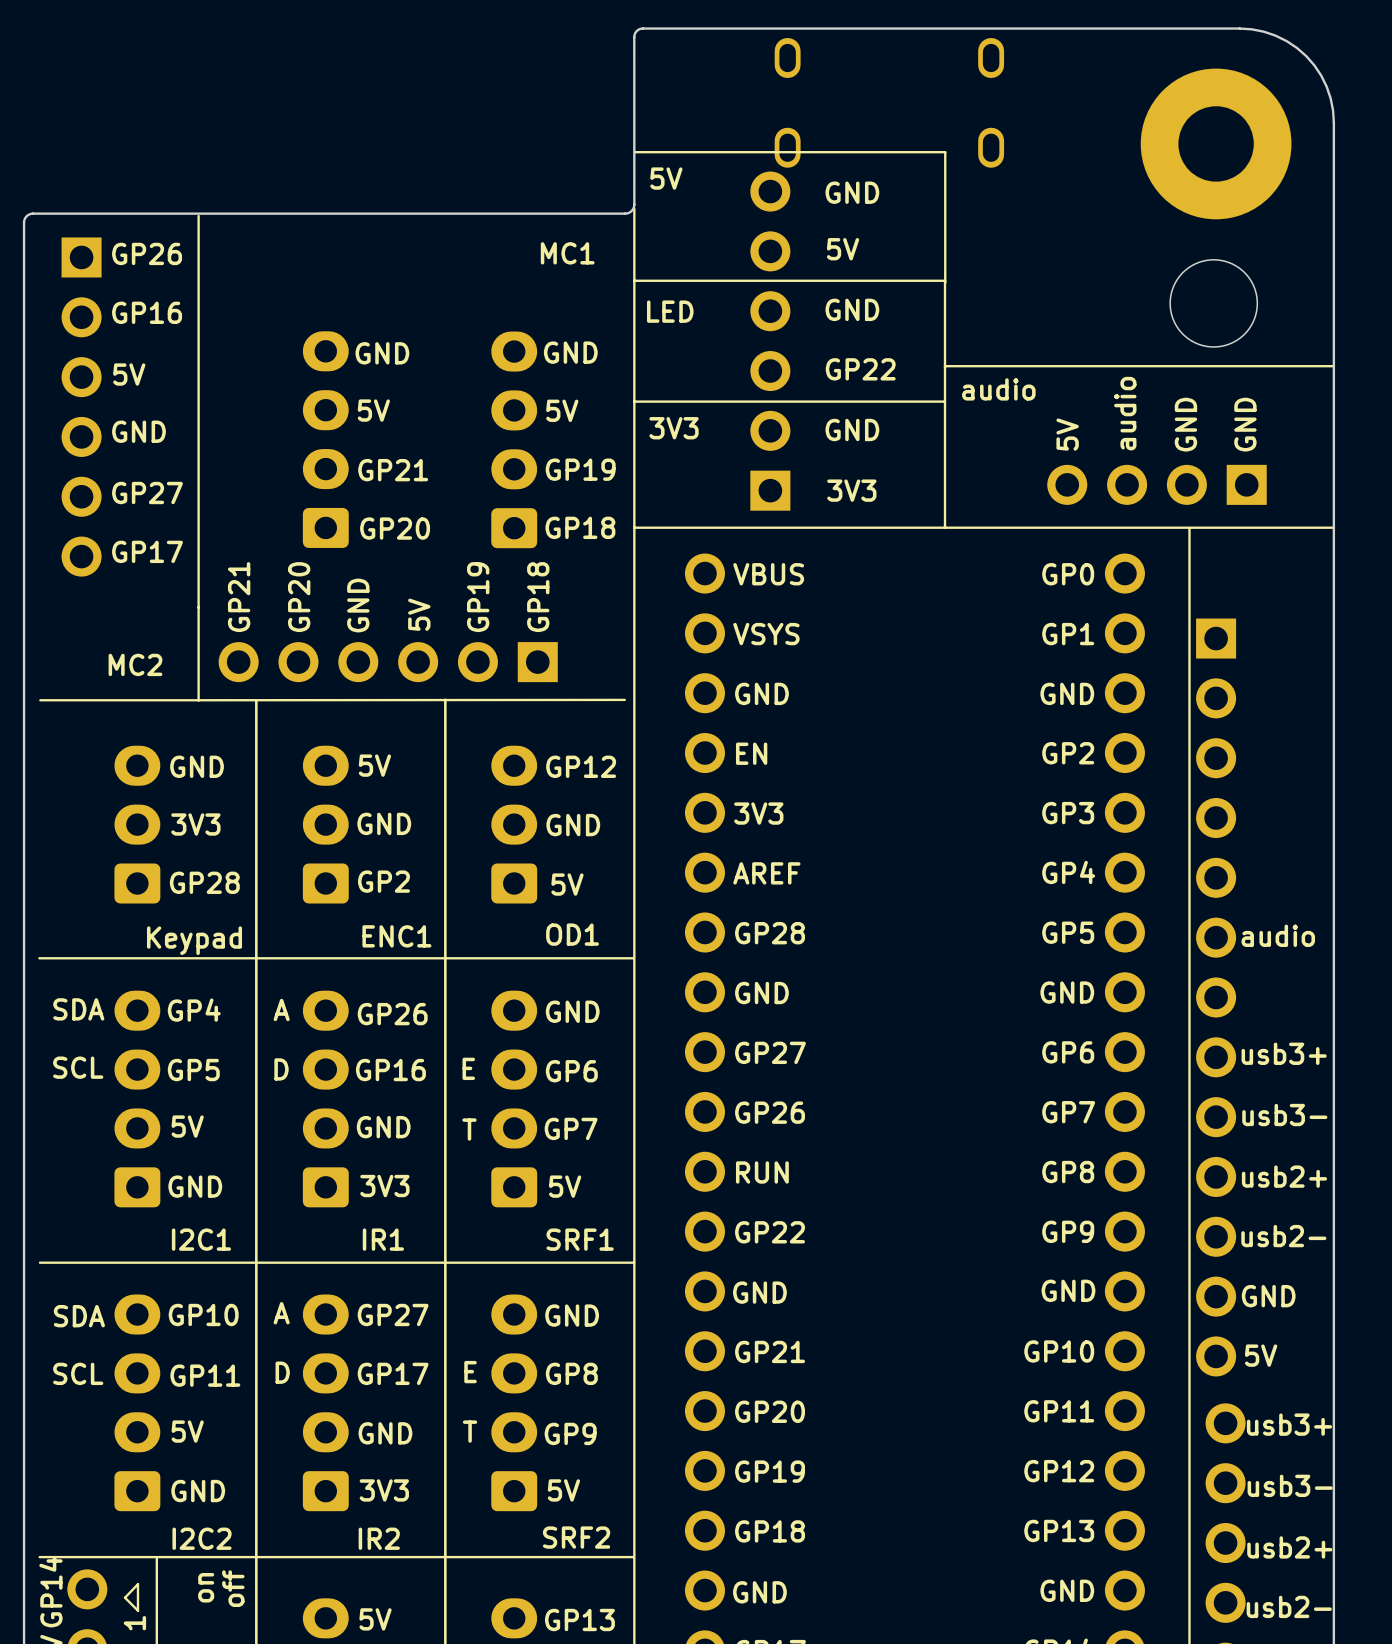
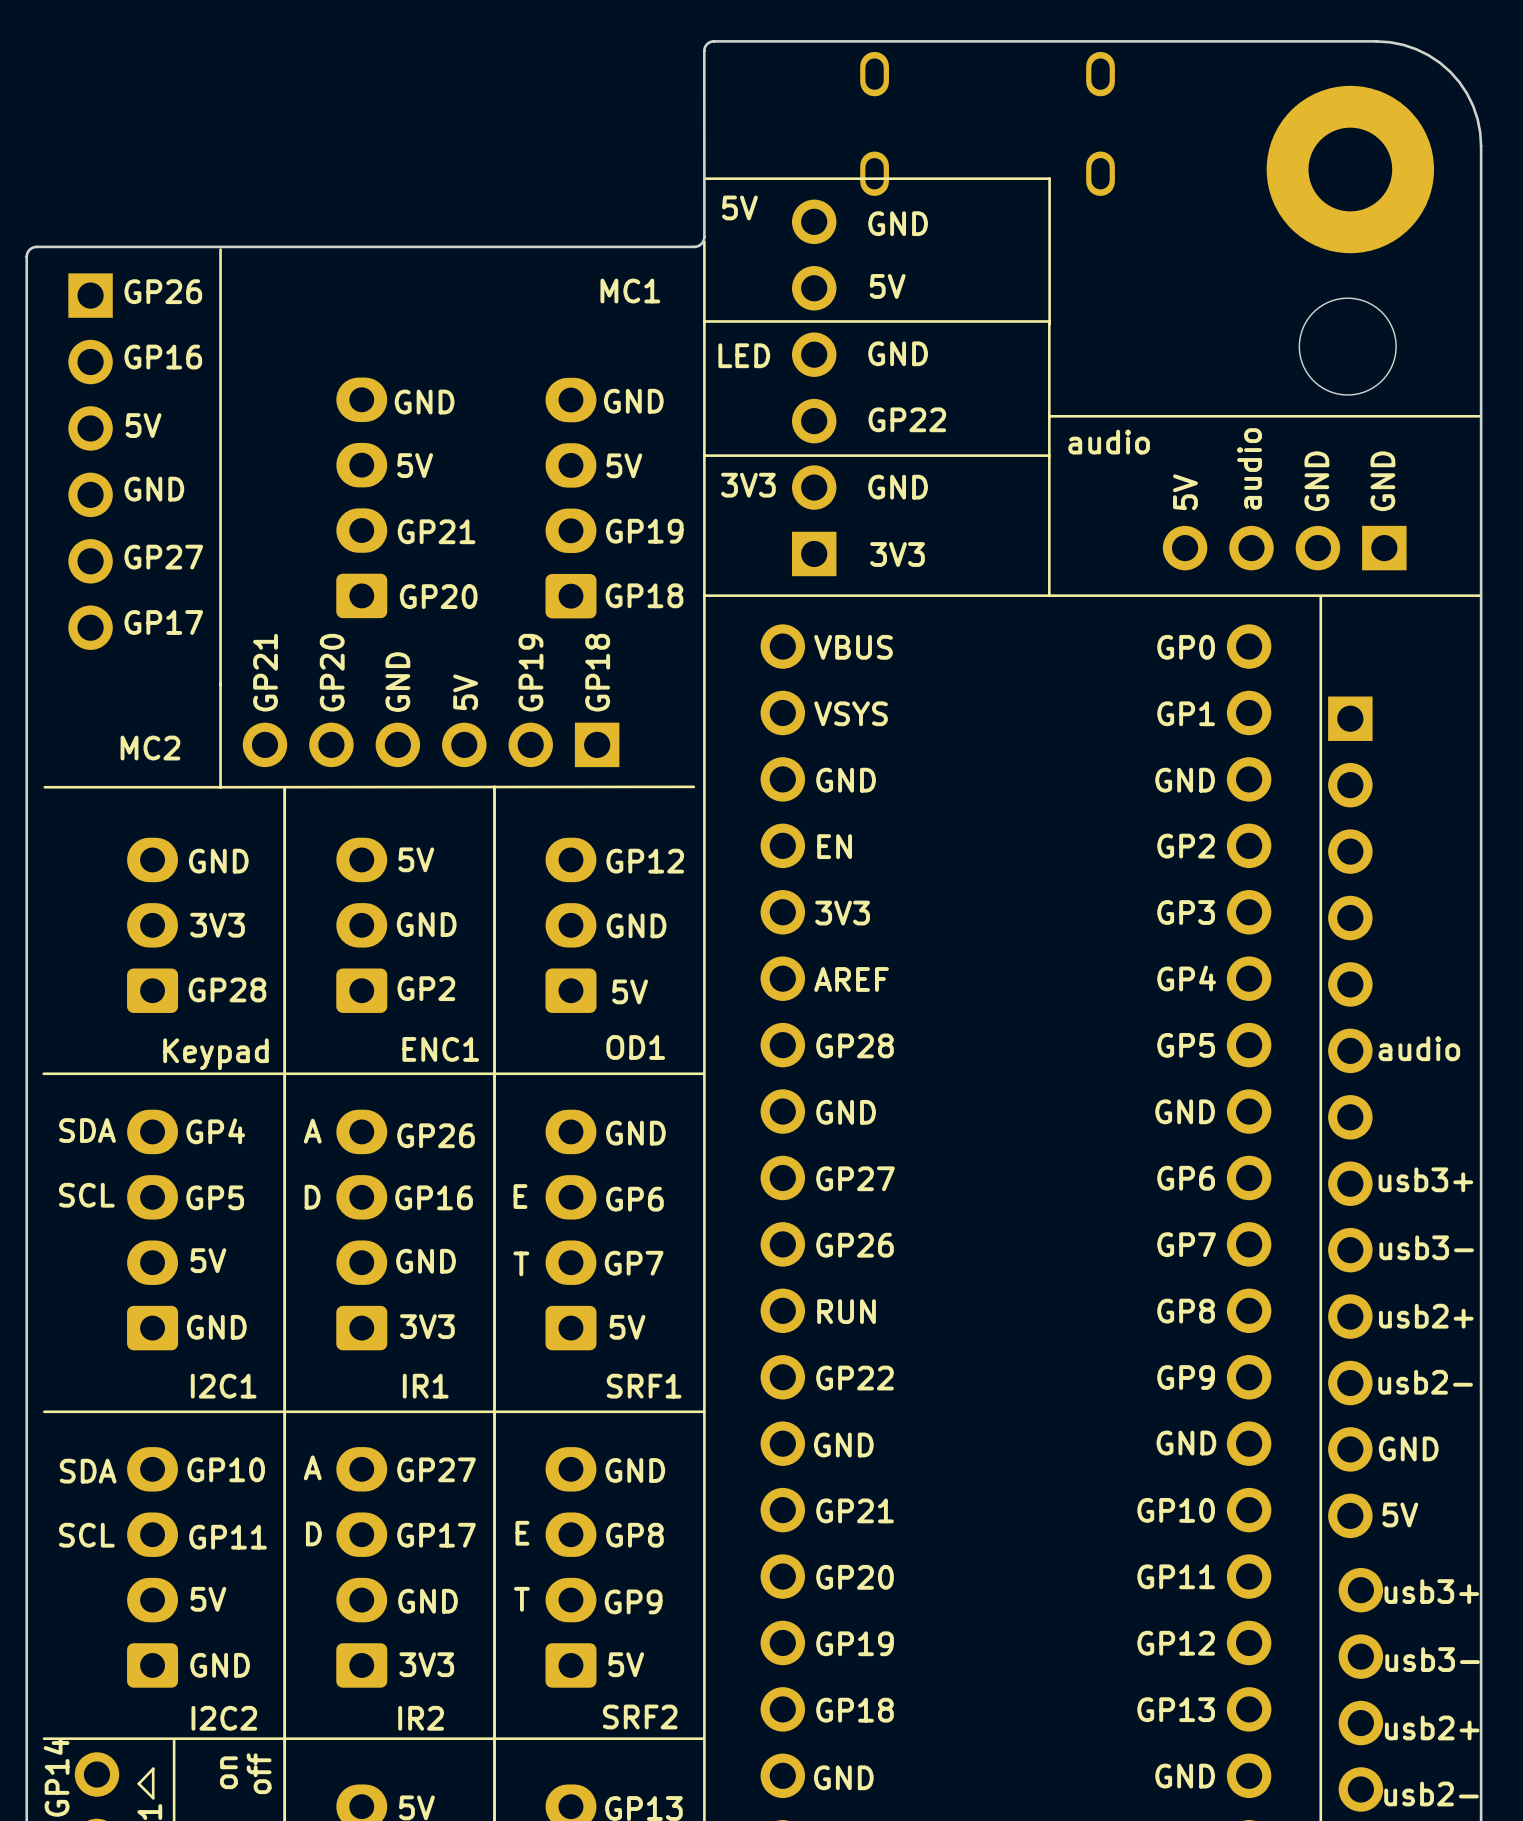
text position: GND (852, 192) -> GND (898, 223)
text position: 5V (843, 249) -> 5V (887, 286)
text position: GND (852, 309) -> GND (898, 353)
part position: (770, 341) -> (814, 387)
text position: GP22 (860, 369) -> GP22 (907, 419)
text position: GND (852, 429) -> GND (898, 487)
text position: 3V3 (851, 490) -> 3V3 (897, 554)

